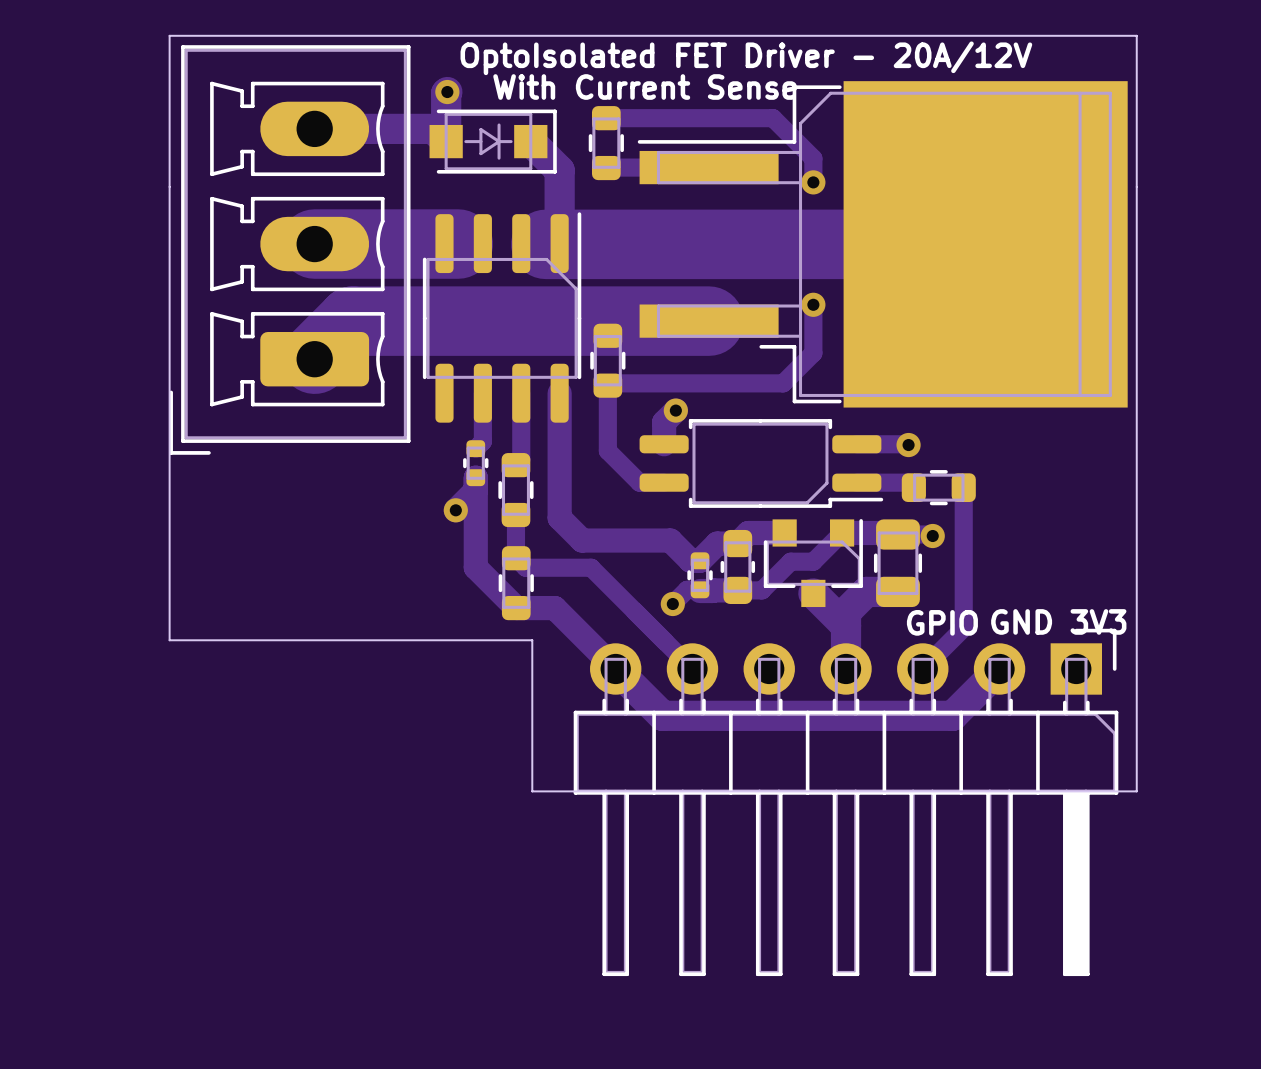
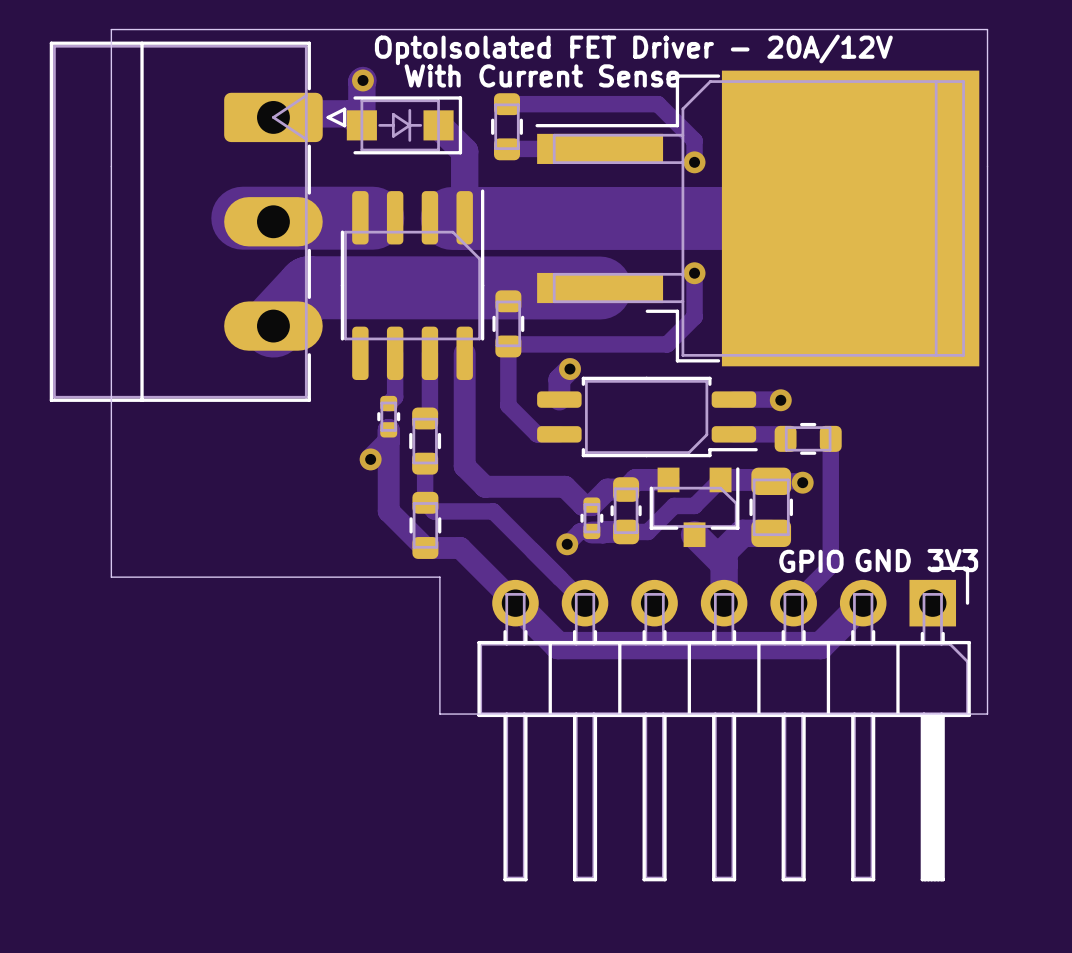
part footprint: [169, 45, 411, 455] -> [49, 41, 347, 402]
track: (709, 321) (352, 321) (314, 359) -> (600, 288) (309, 287) (273, 326)

